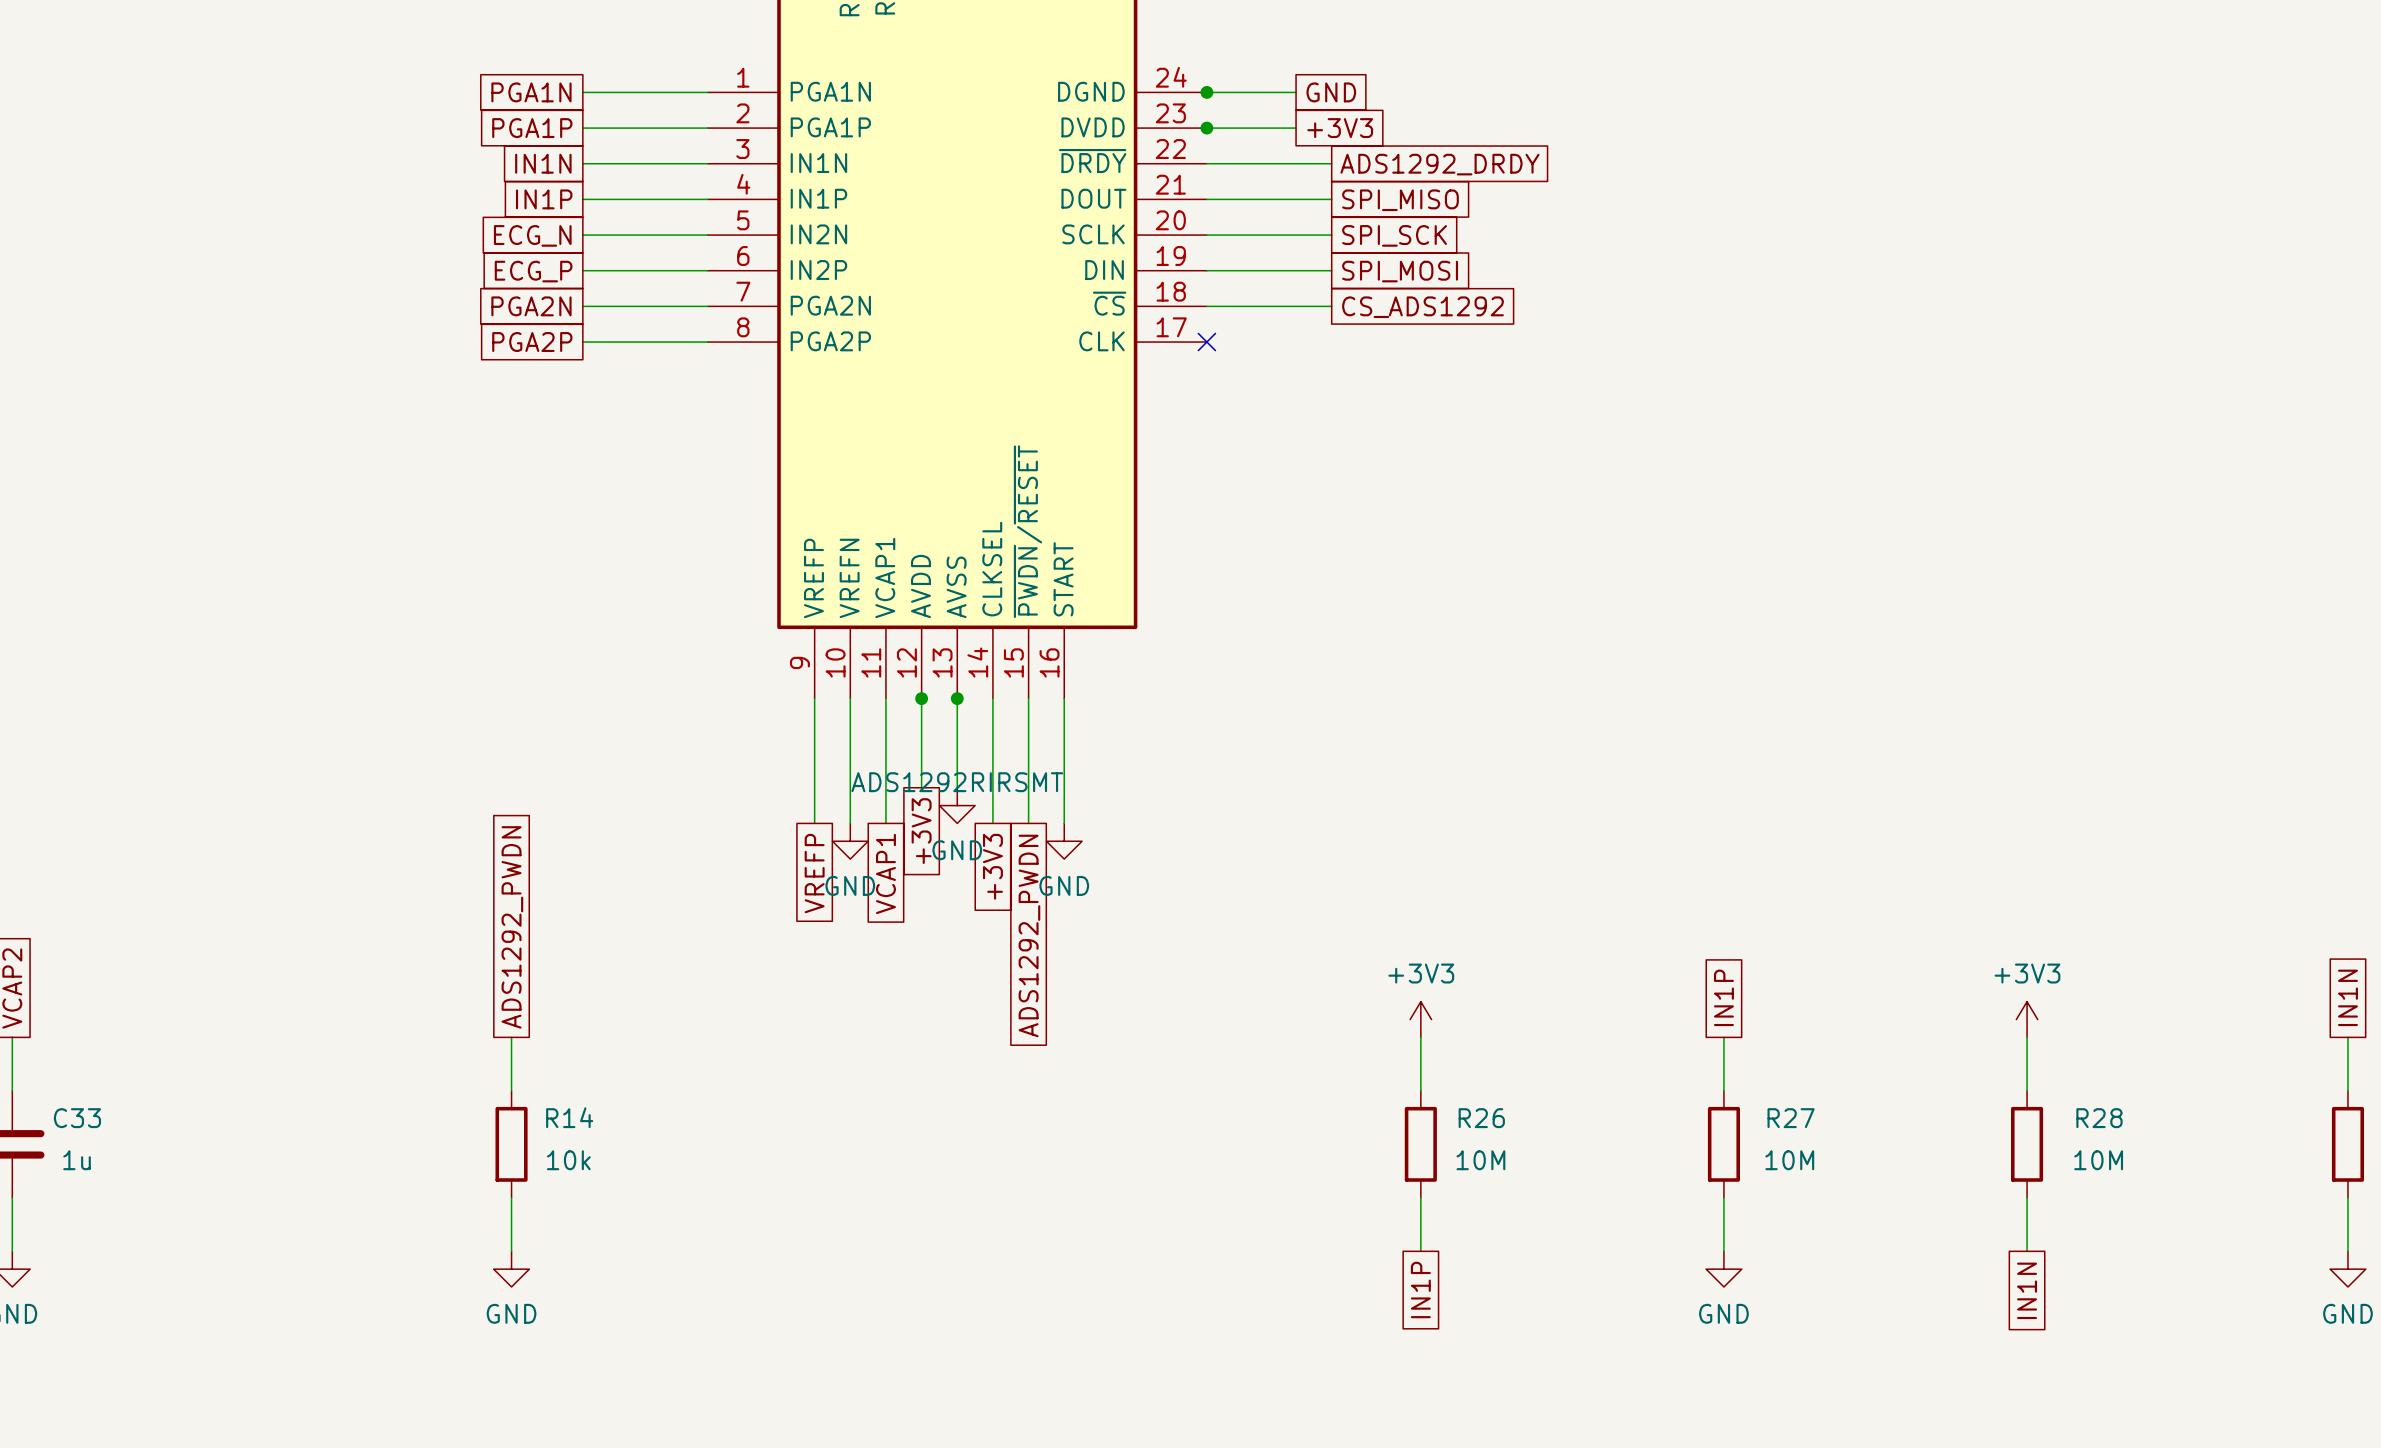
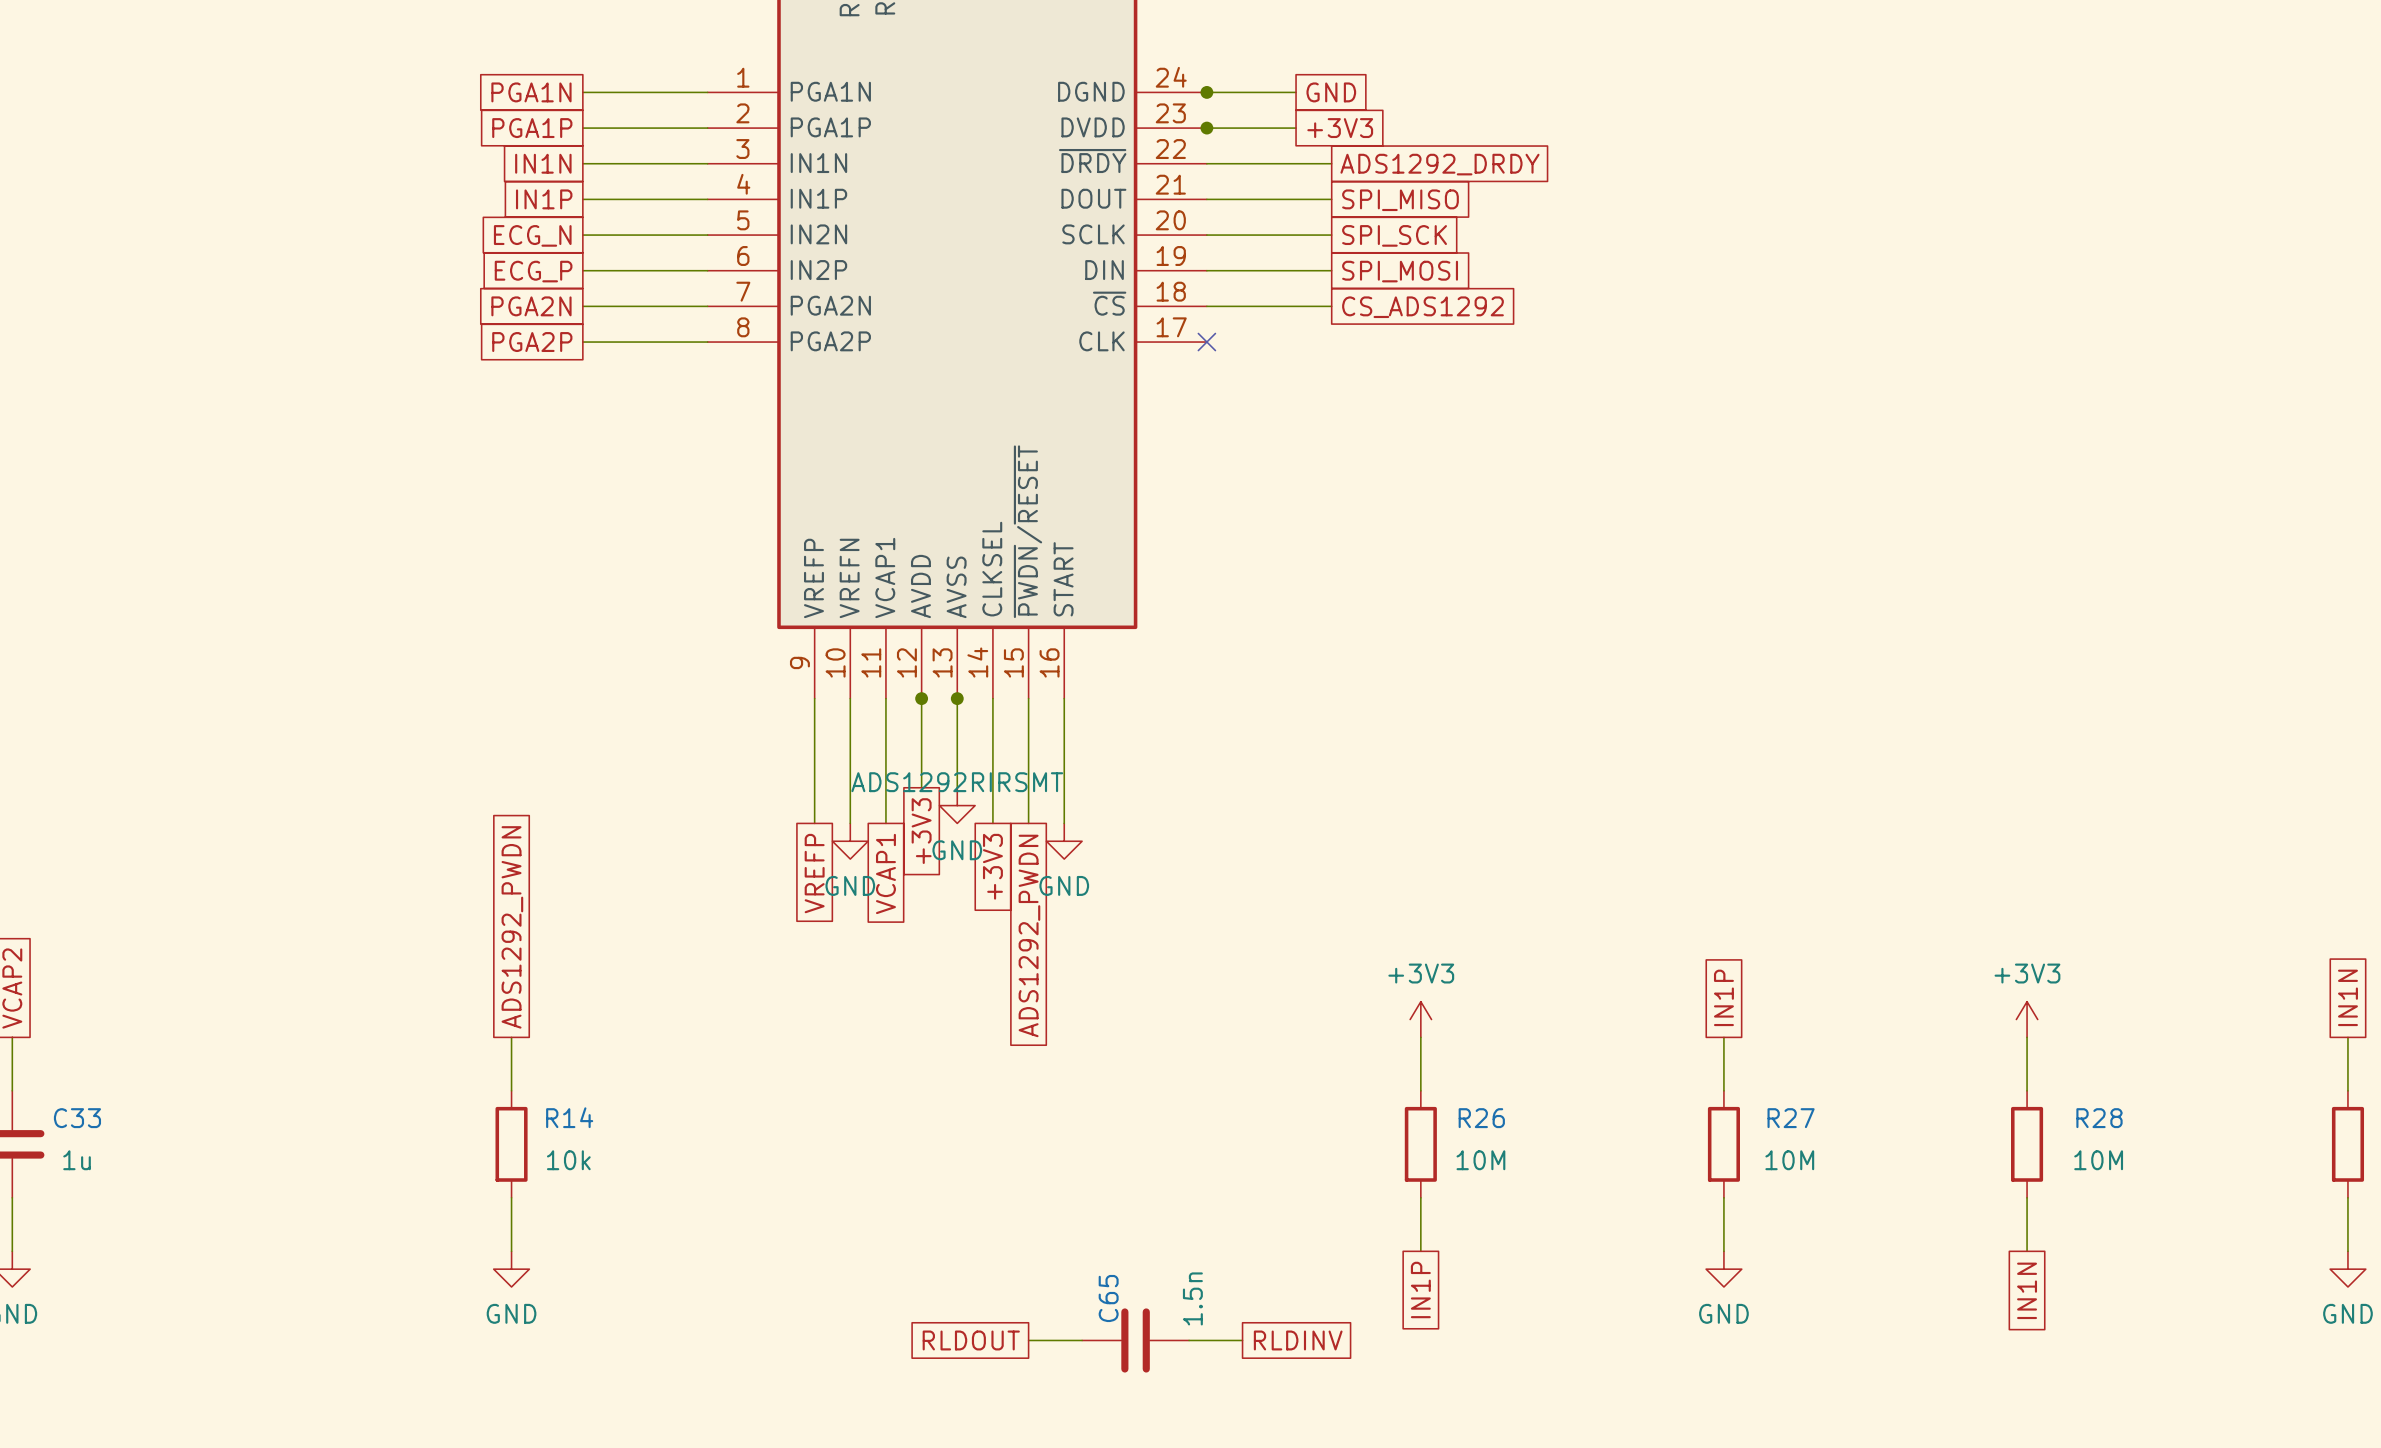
global label: none -> RLDOUT (971, 1340)
wire: none -> (1028, 1340) (1082, 1340)
C65: none -> 1.5n (1135, 1340)
wire: none -> (1189, 1340) (1242, 1340)
global label: none -> RLDINV (1298, 1340)

